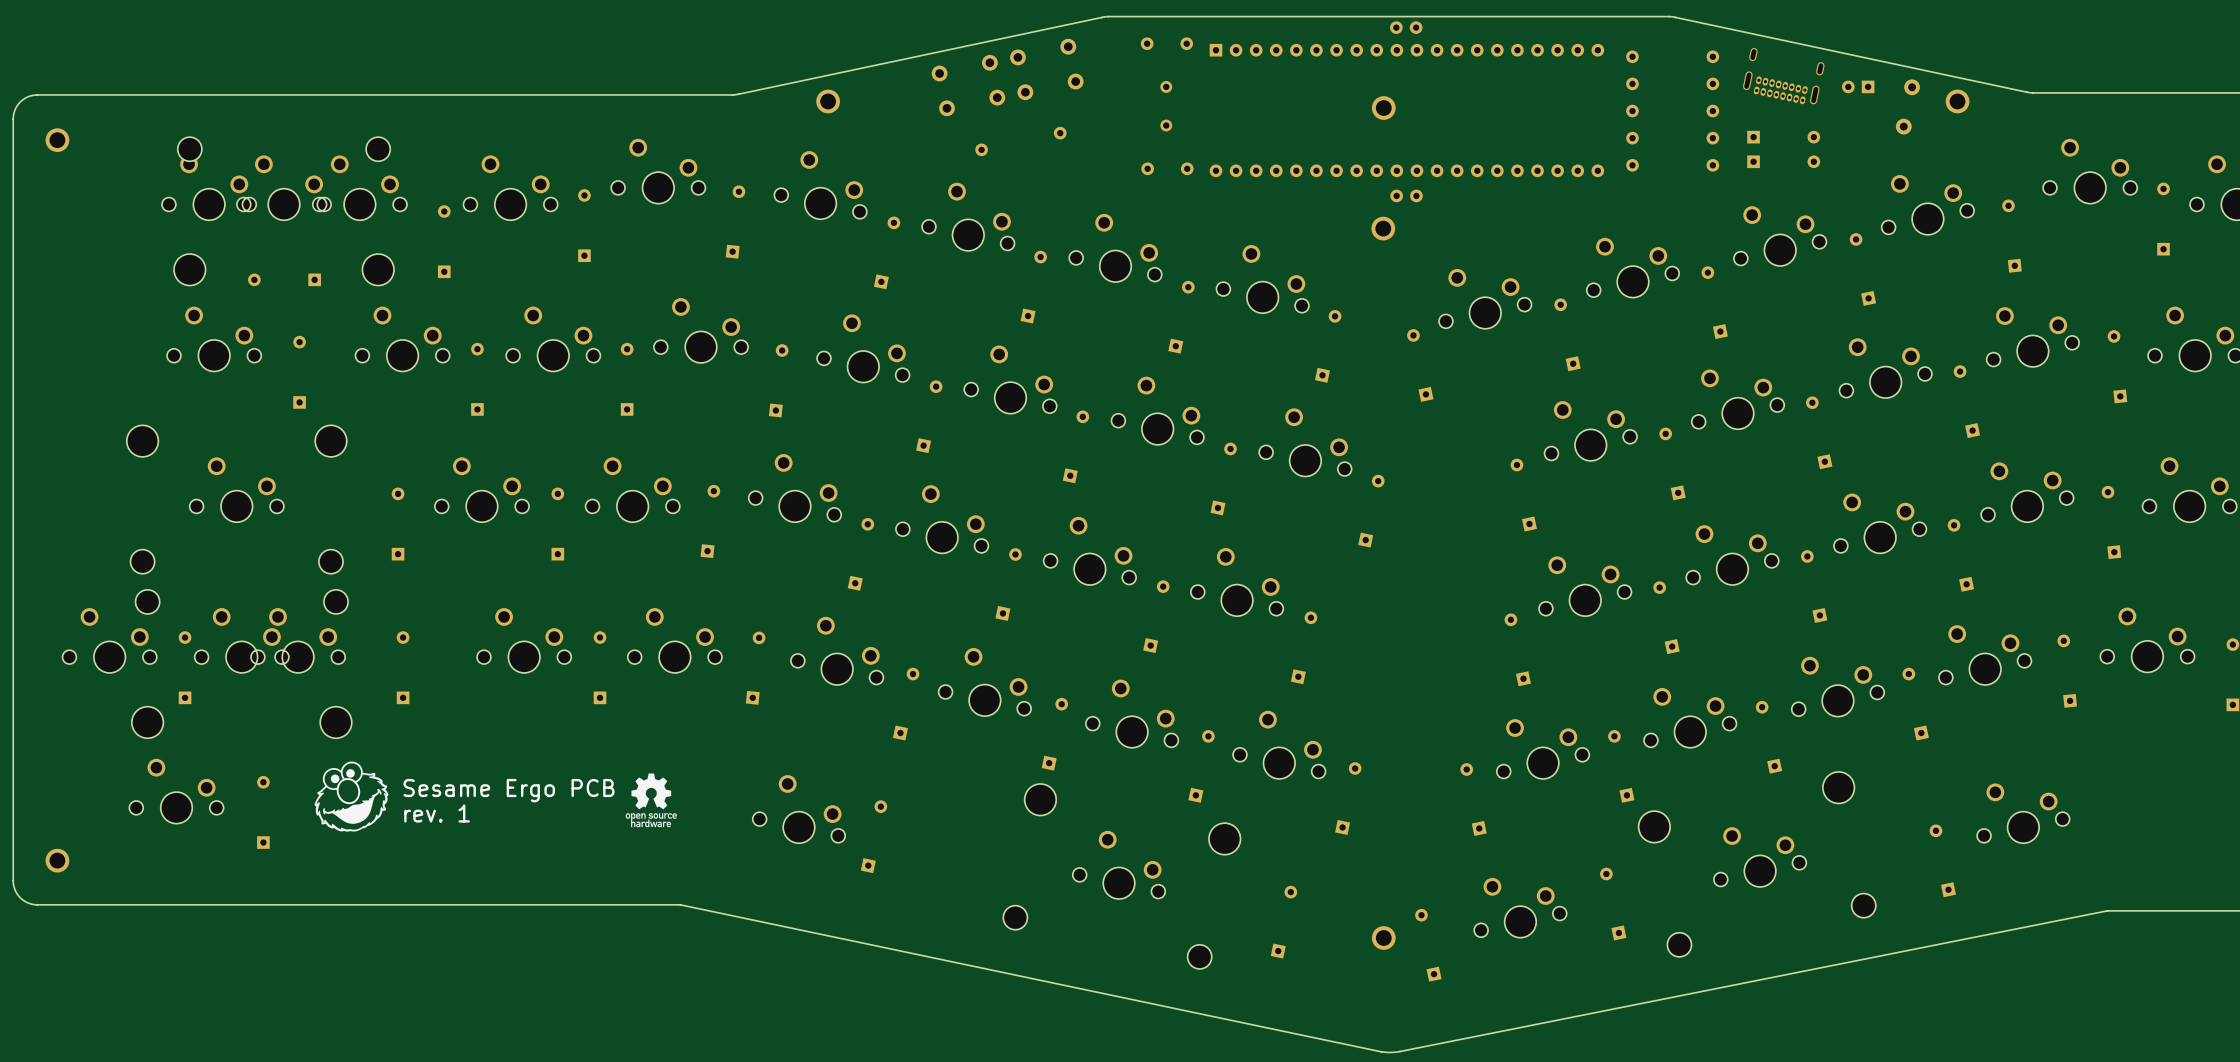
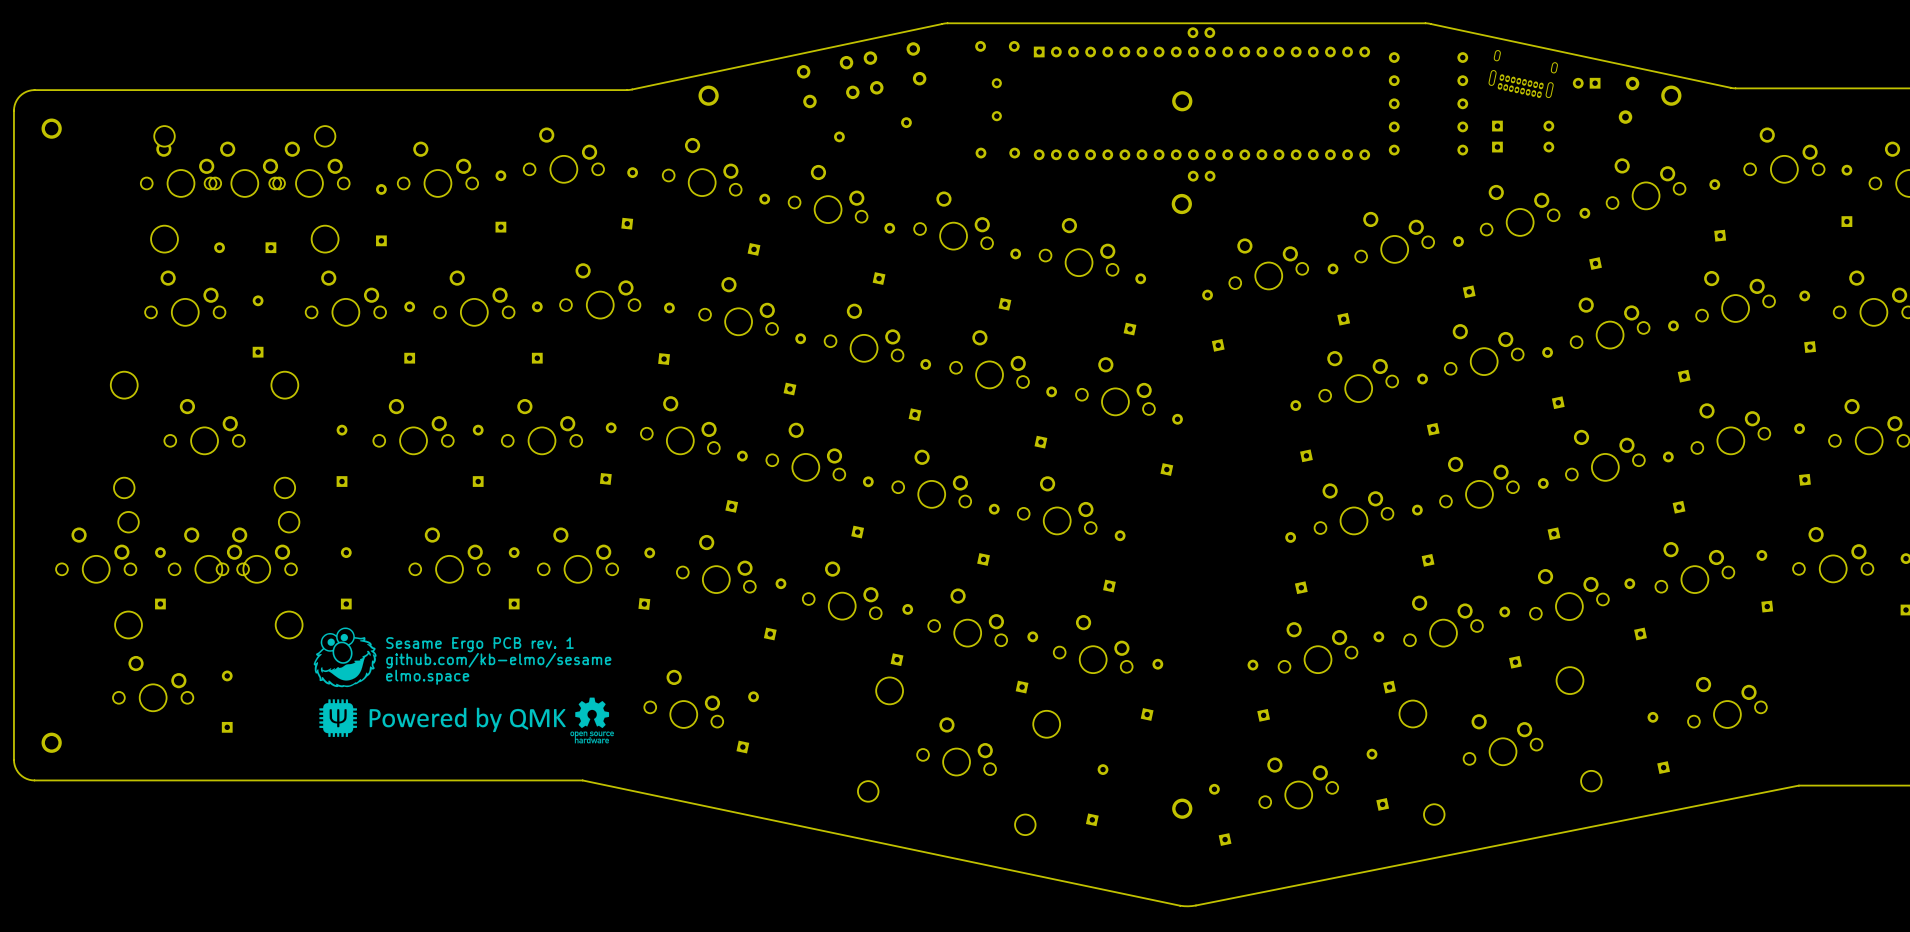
text: none -> Sesame Ergo PCB rev. 1 (480, 644)
text: none -> github.com/kb-elmo/sesame (498, 660)
text: none -> elmo.space (427, 677)
text: Sesame Ergo PCB (509, 790) -> none
drawing position: (351, 796) -> (345, 657)
drawing position: (651, 800) -> (592, 720)
drawing: none -> [319, 699, 566, 738]
text: rev. 1 (437, 813) -> none

